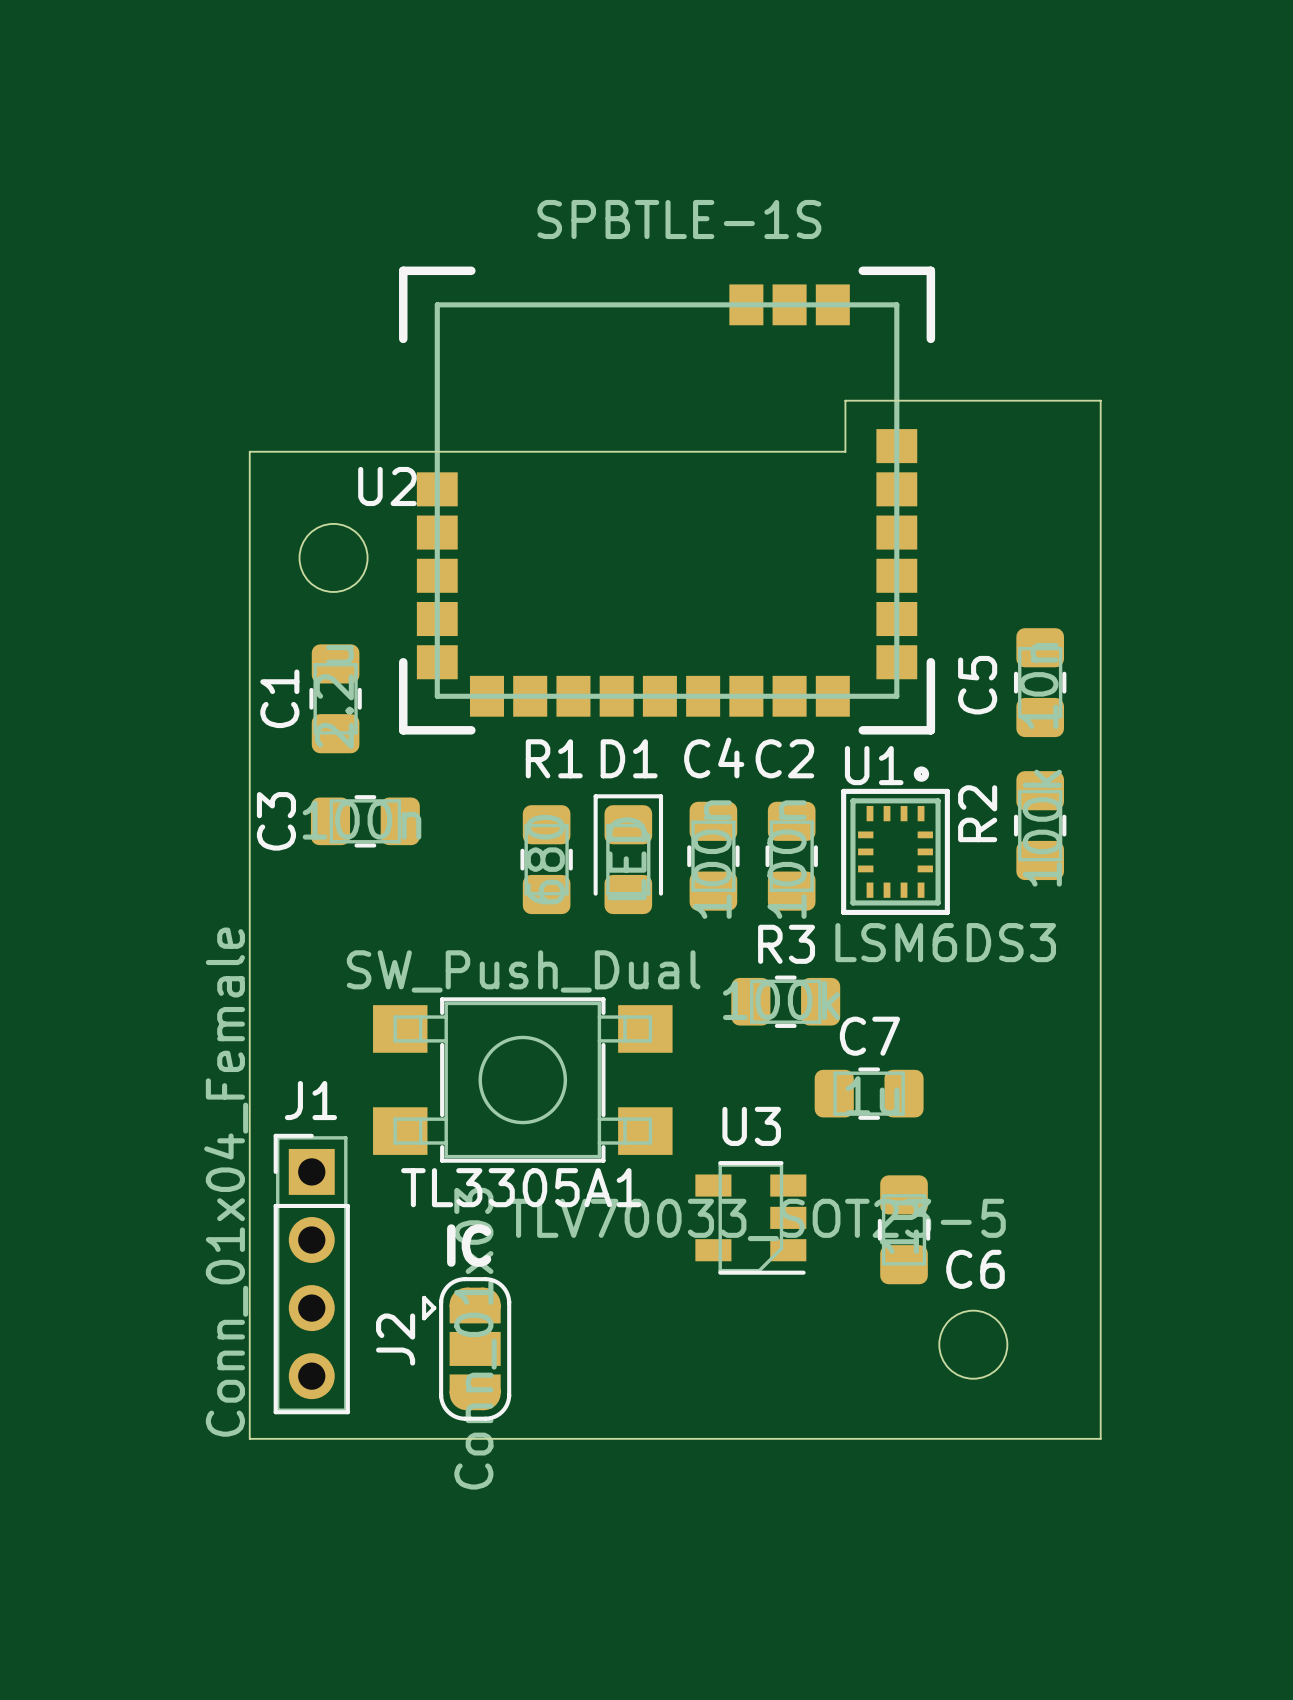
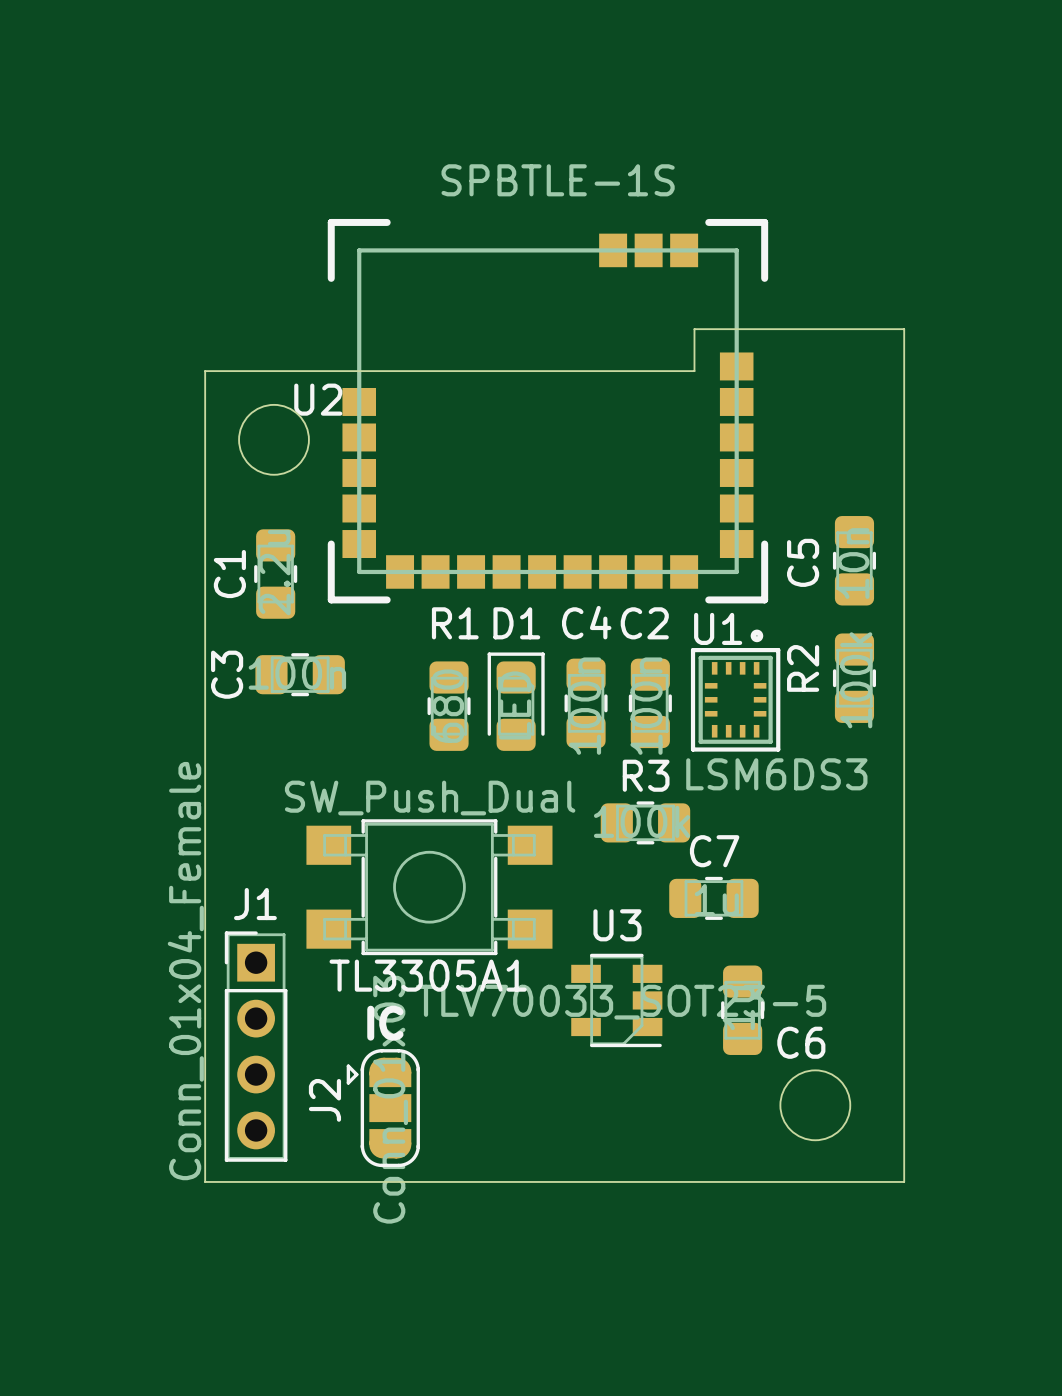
round board edge size: [299, 523, 369, 593] -> [238, 404, 310, 476]
round board edge size: [938, 1310, 1008, 1380] -> [780, 1070, 851, 1141]

